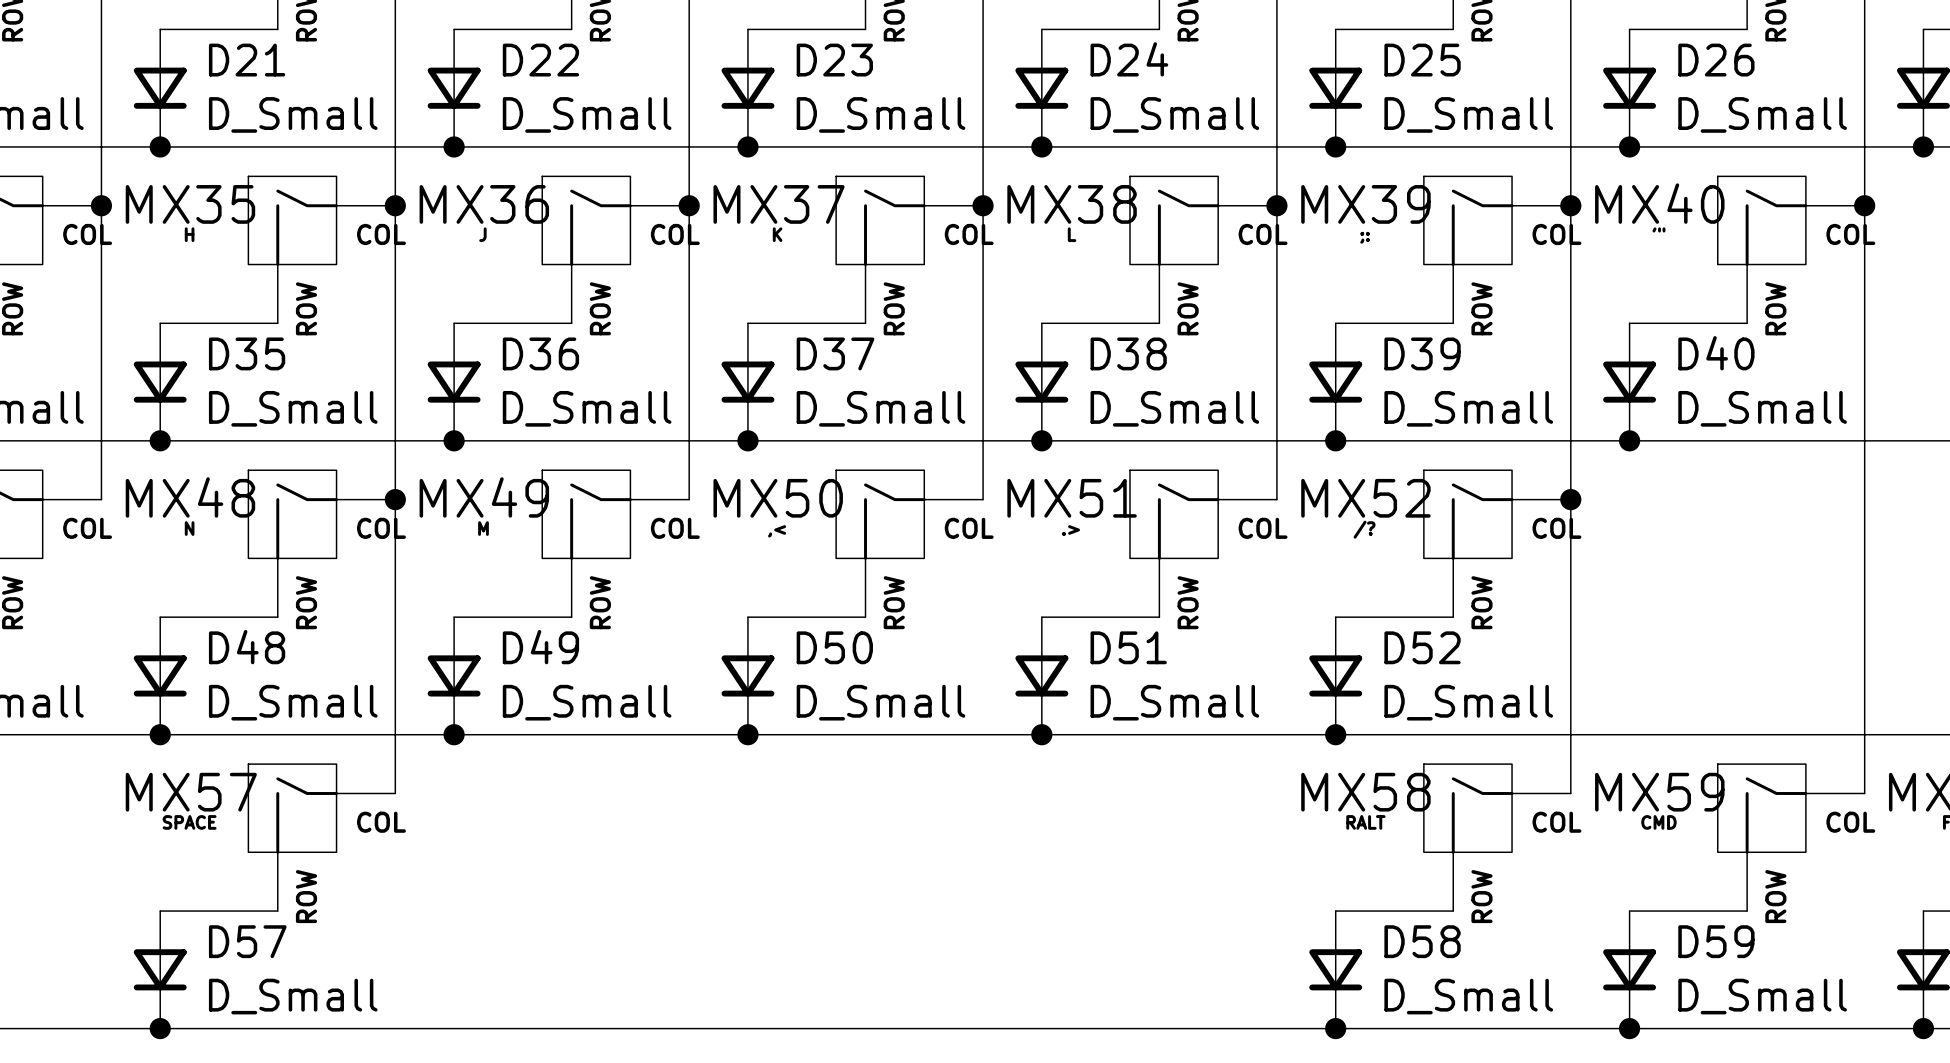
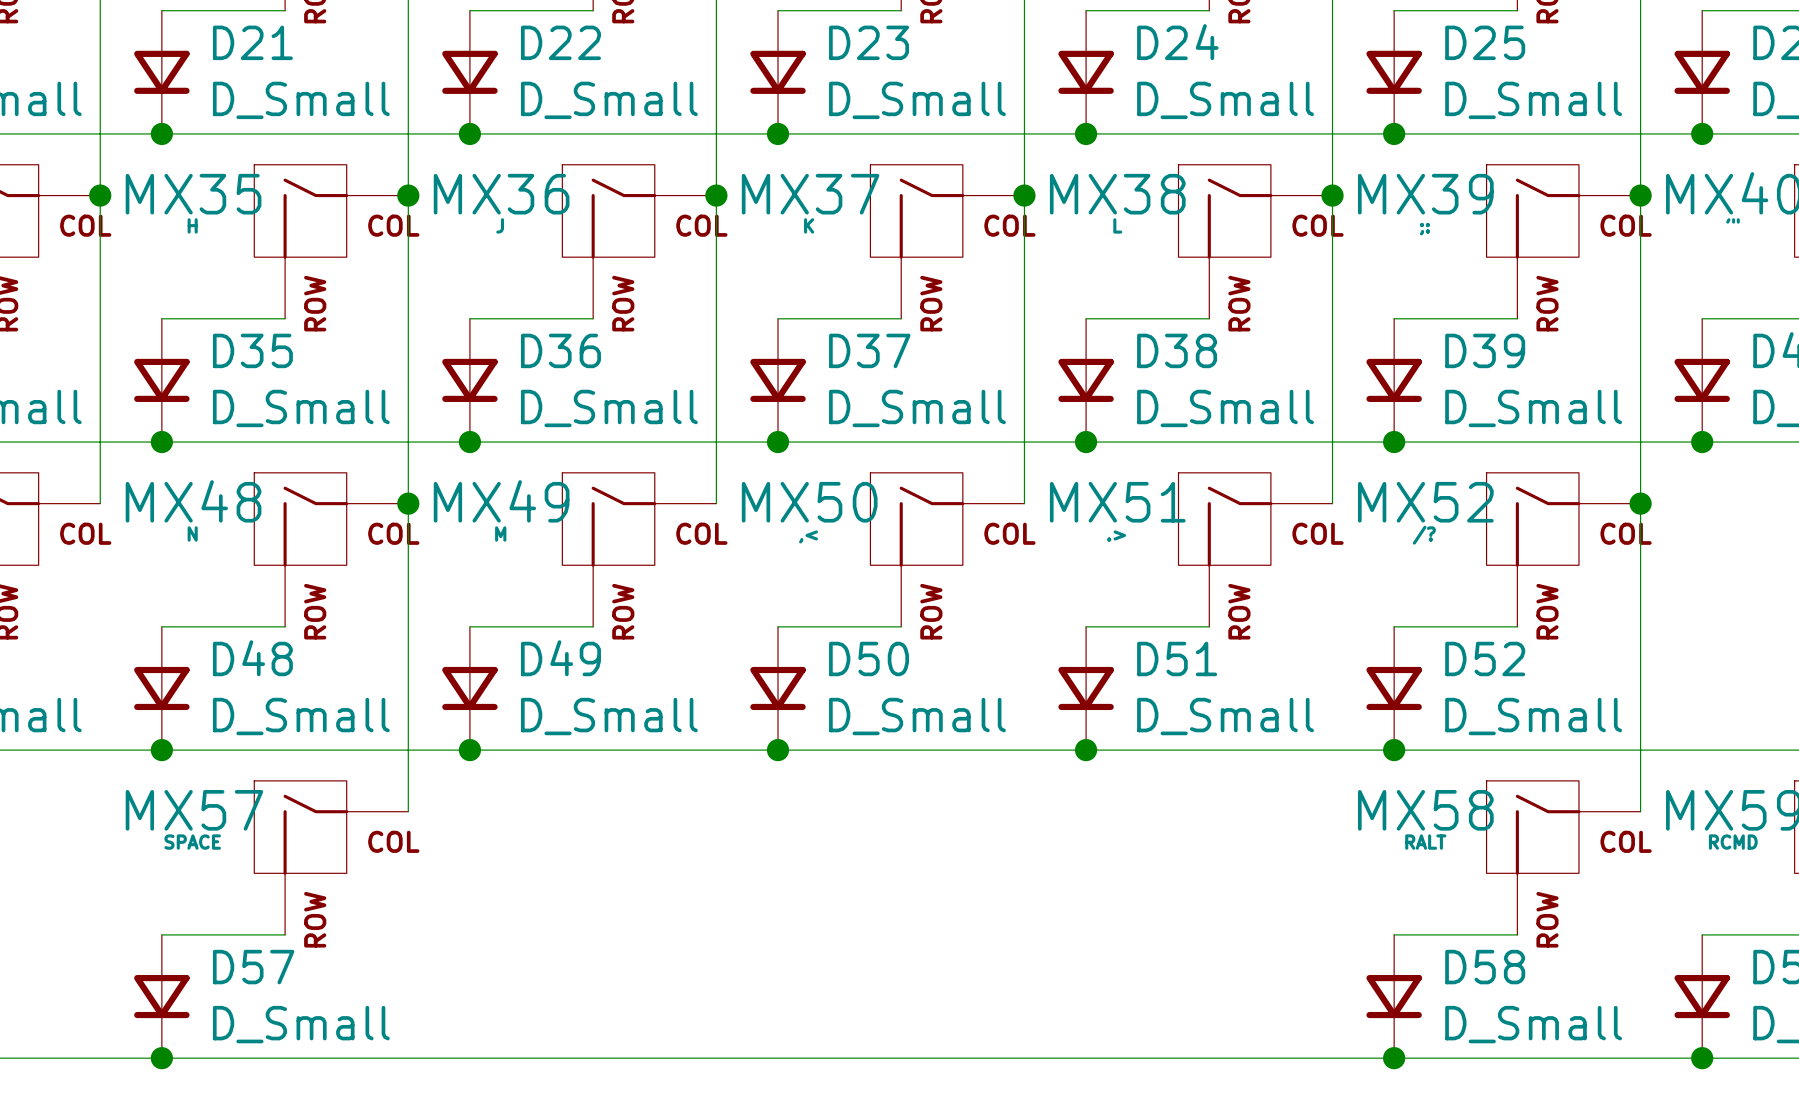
MX59 value: CMD (1658, 822) -> RCMD (1733, 842)

